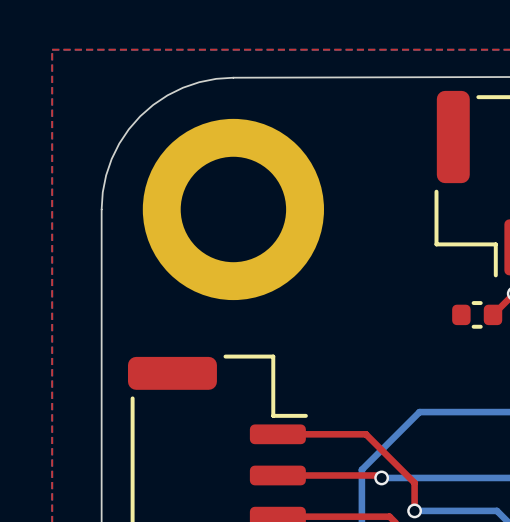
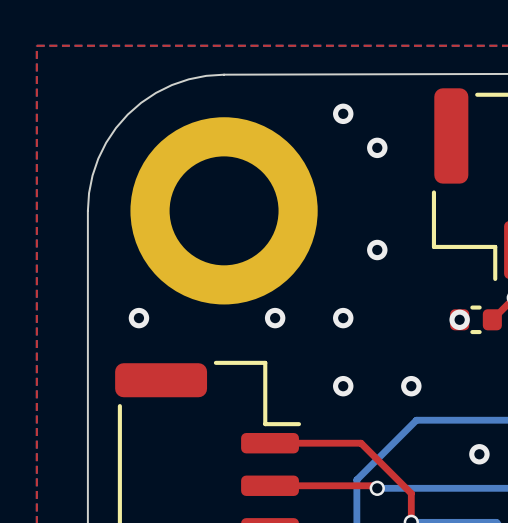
via: none -> (343, 113)
via: none -> (377, 147)
via: none -> (377, 250)
via: none -> (138, 318)
via: none -> (275, 318)
via: none -> (343, 318)
via: none -> (459, 319)
via: none -> (343, 386)
via: none -> (411, 386)
via: none -> (479, 454)

